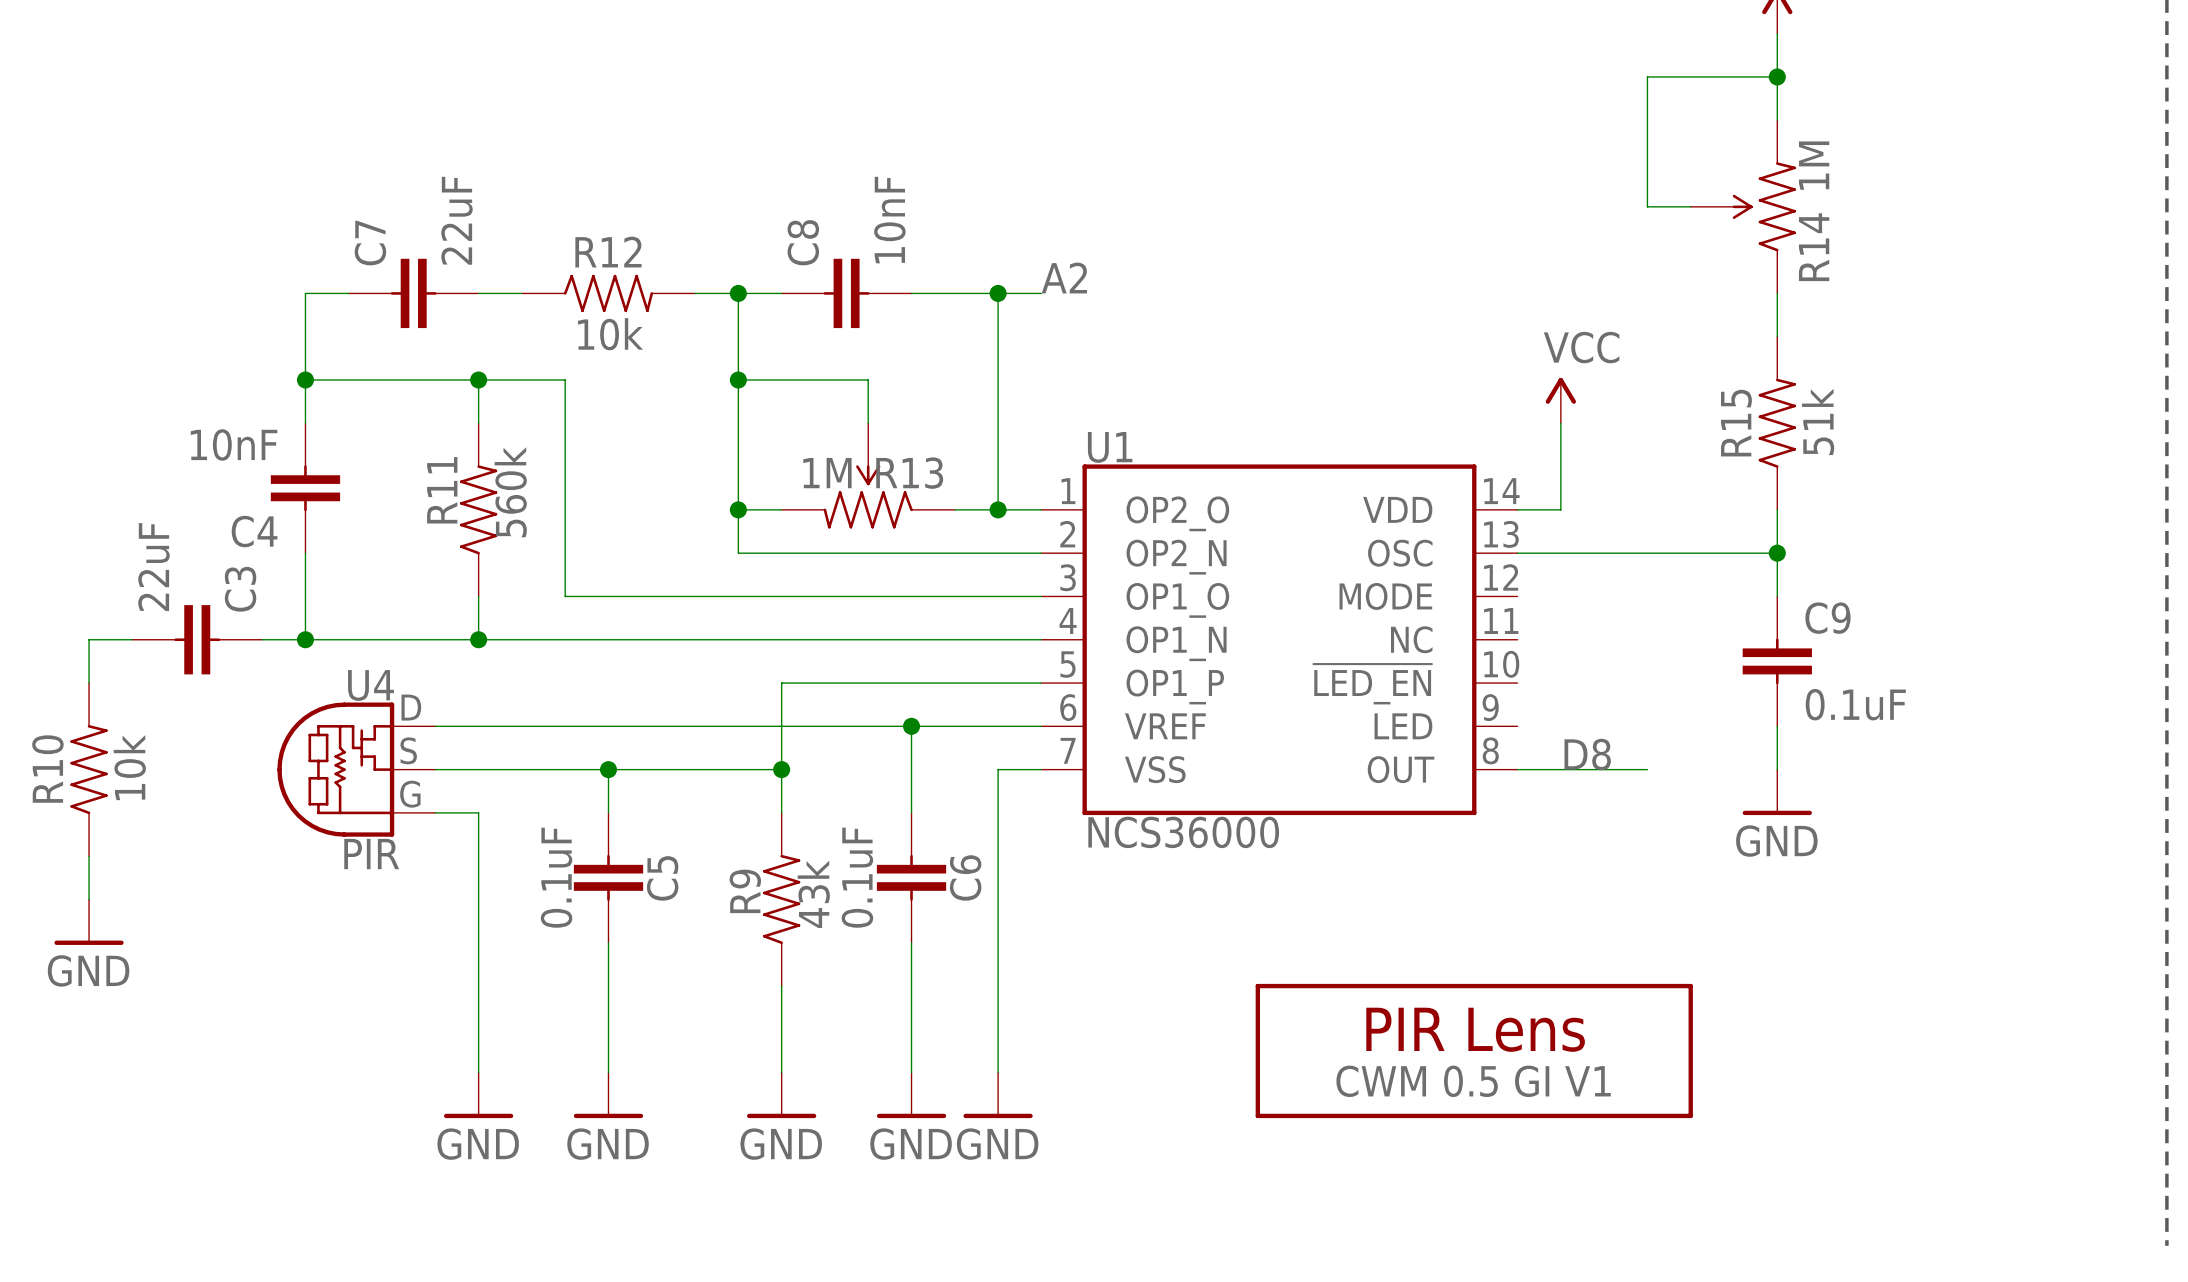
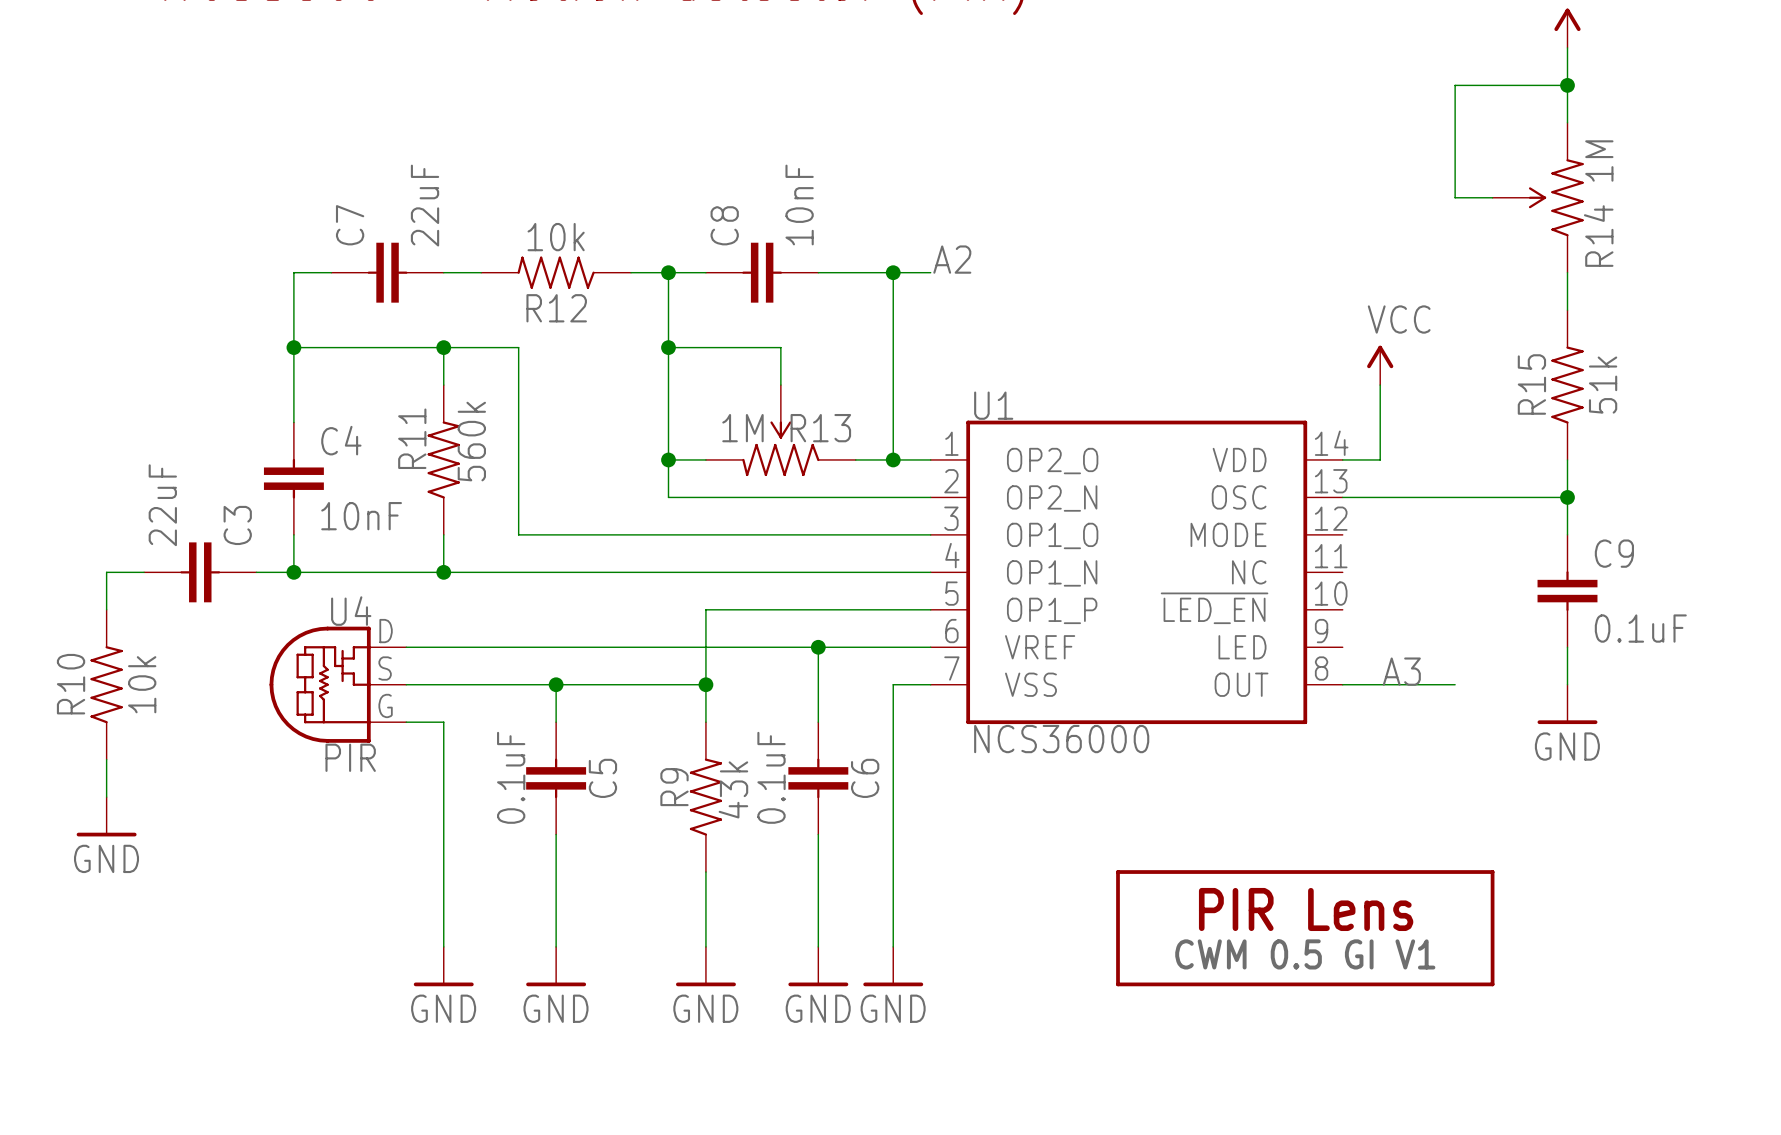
R12 rotation: 0° (608, 293) -> 180° (556, 272)
C4 value position: 10nF (234, 444) -> 10nF (361, 516)
C4 position: (305, 488) -> (293, 478)
C4 name position: C4 (254, 531) -> C4 (341, 440)
label: D8 (1587, 754) -> A3 (1401, 671)

